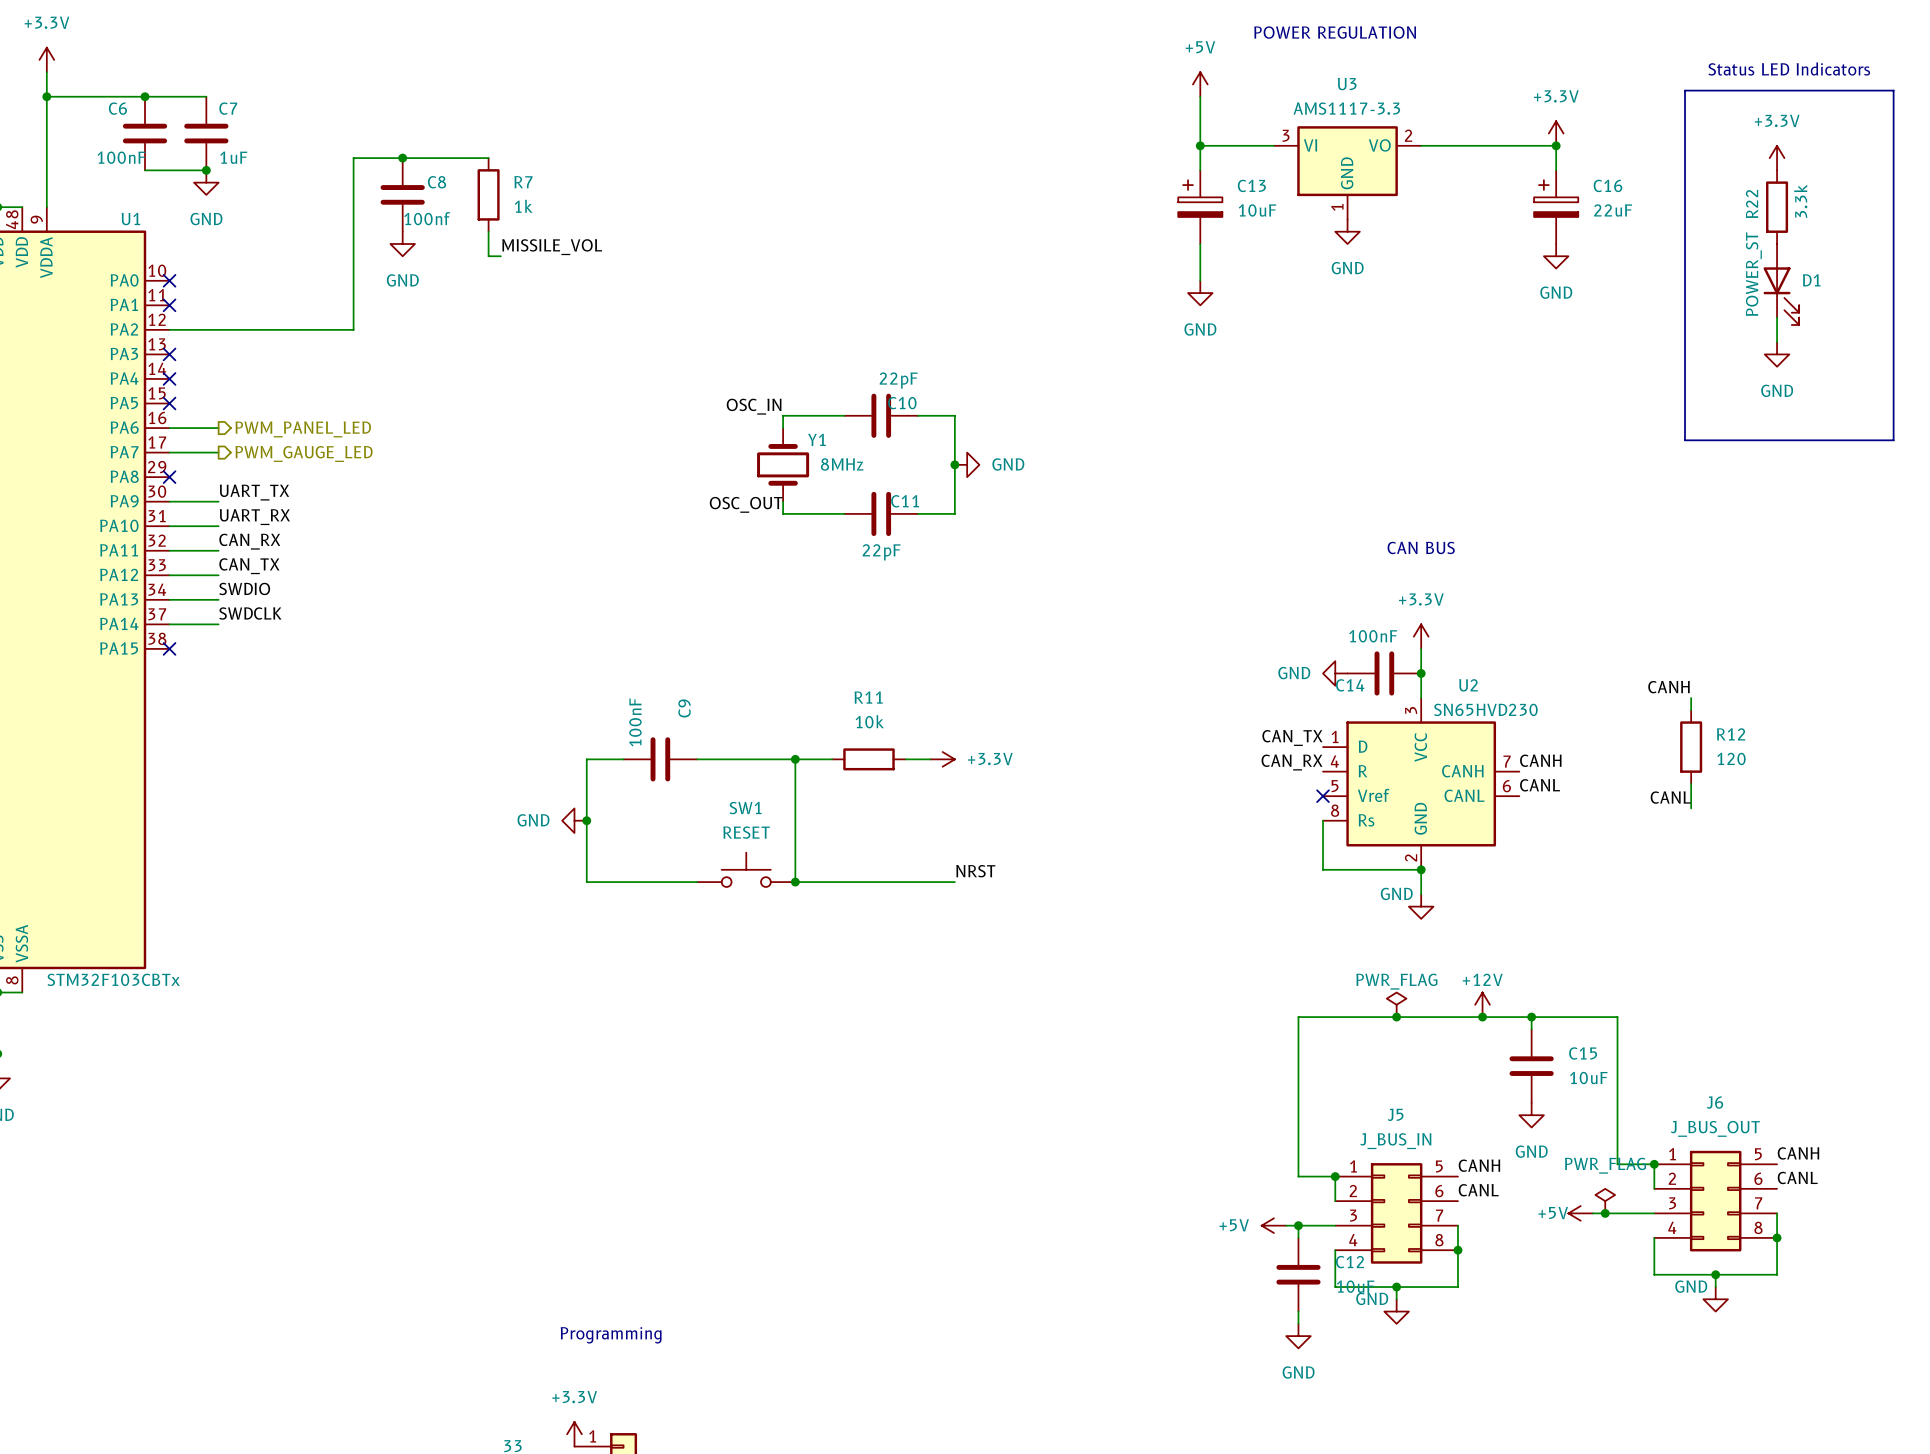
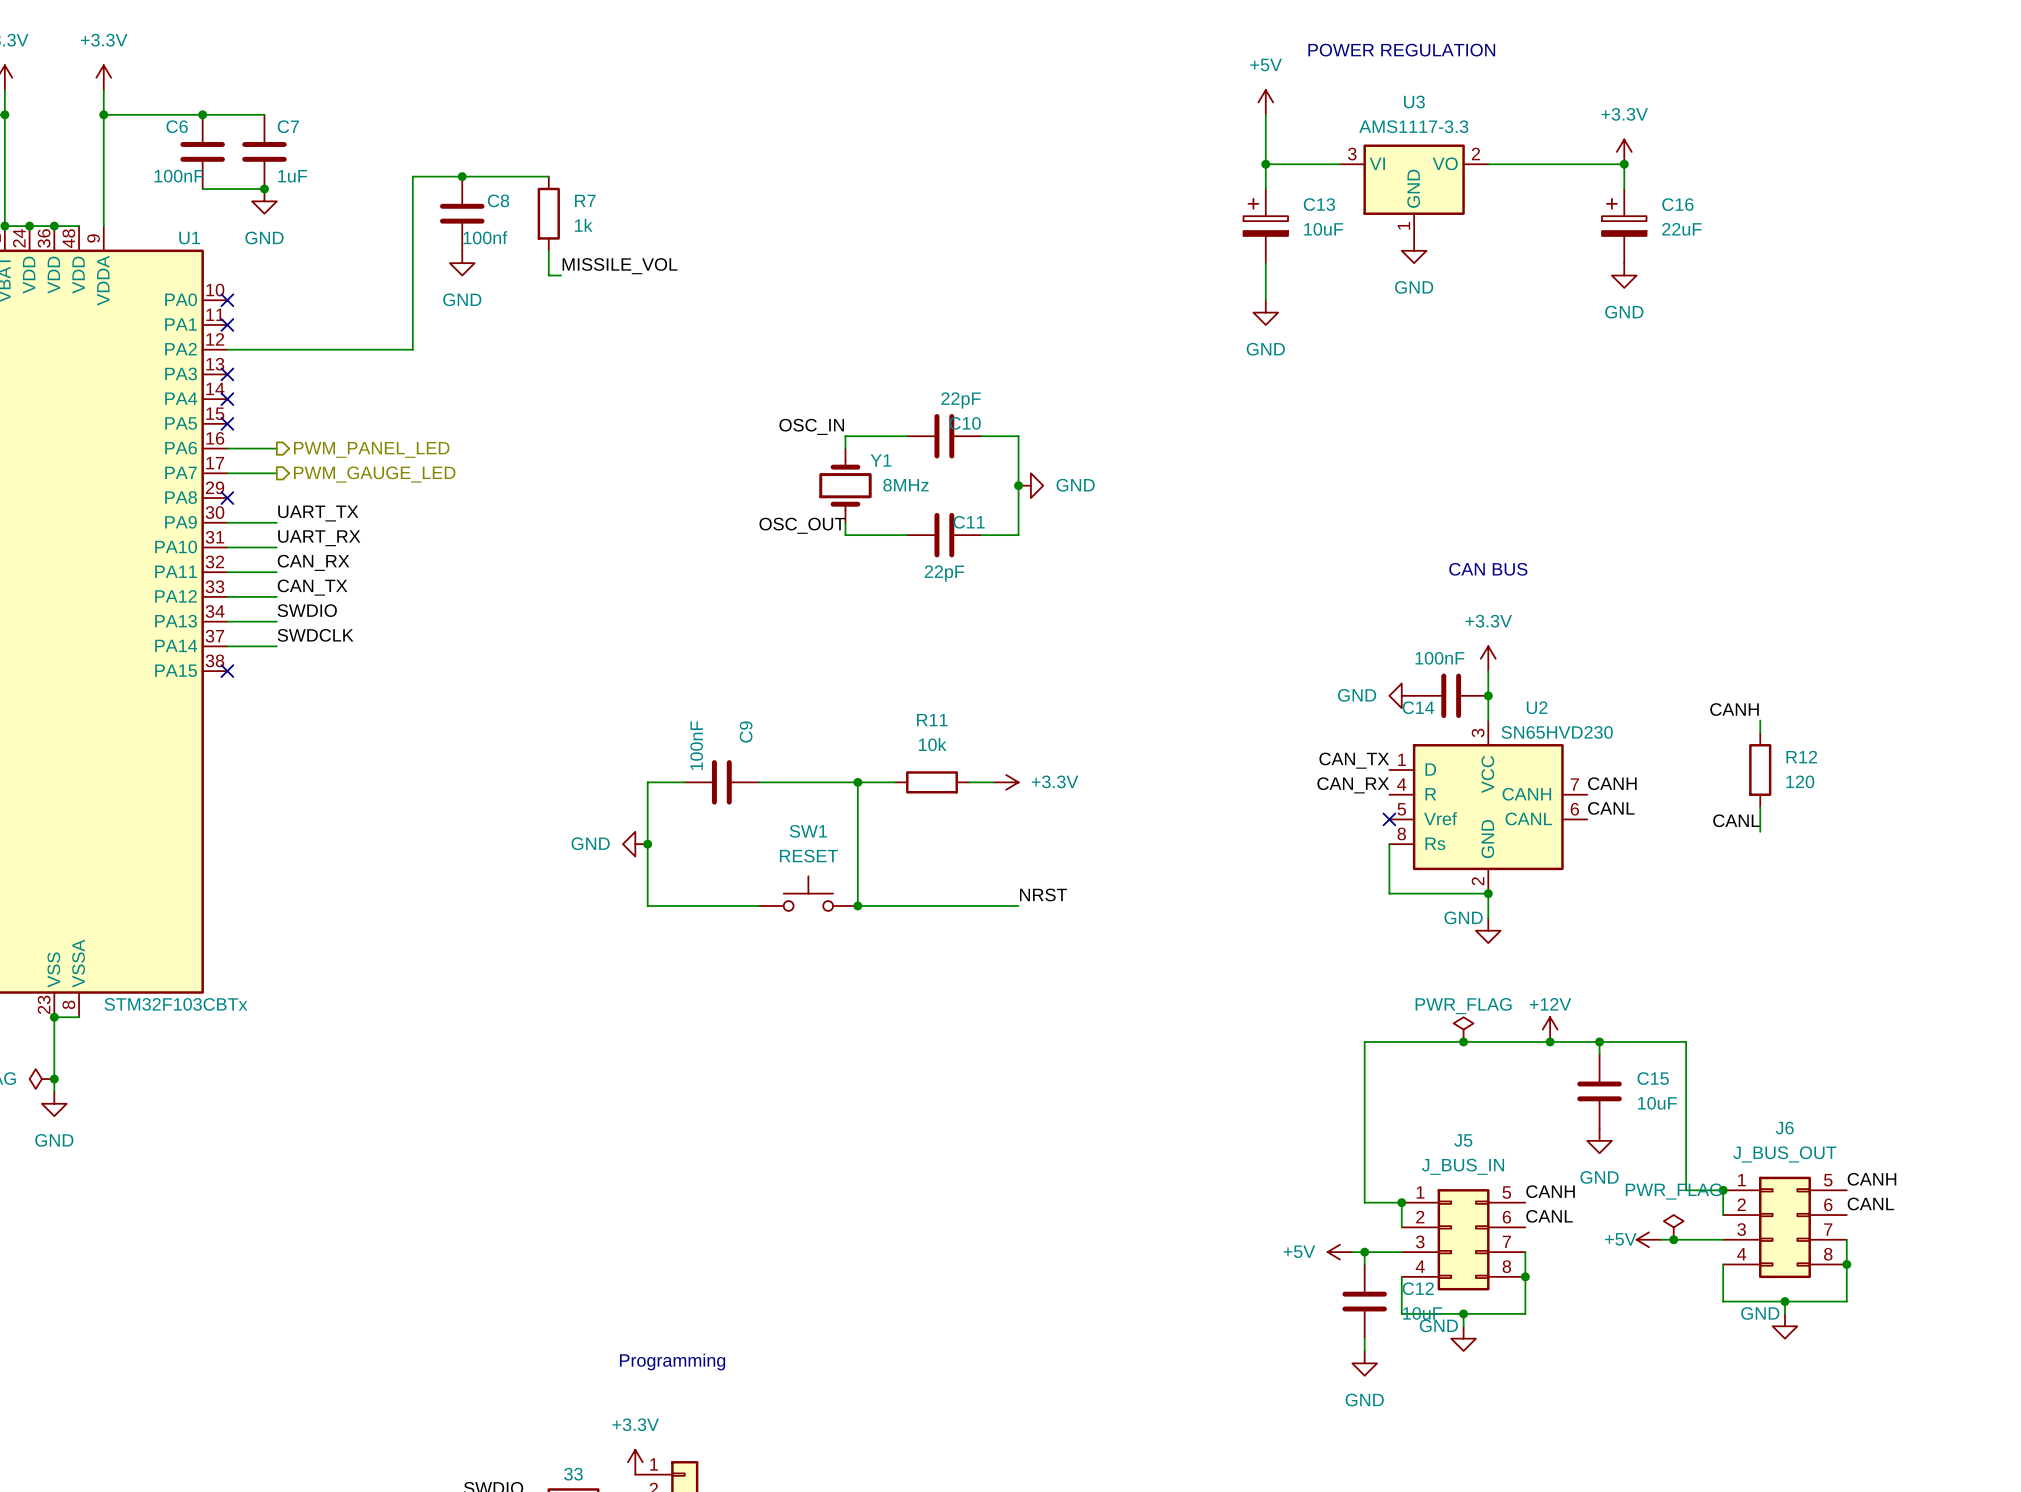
text: Status LED Indicators (1789, 68) -> none
line: (1685, 90) (1893, 90) (1893, 440) (1685, 440) (1685, 90) -> none
power symbol: +3.3V (1777, 158) -> none
R22: 3.3k (1777, 207) -> none
D1: POWER_ST (1781, 284) -> none
wire: (1777, 317) (1777, 342) -> none
power symbol: GND (1777, 354) -> none

